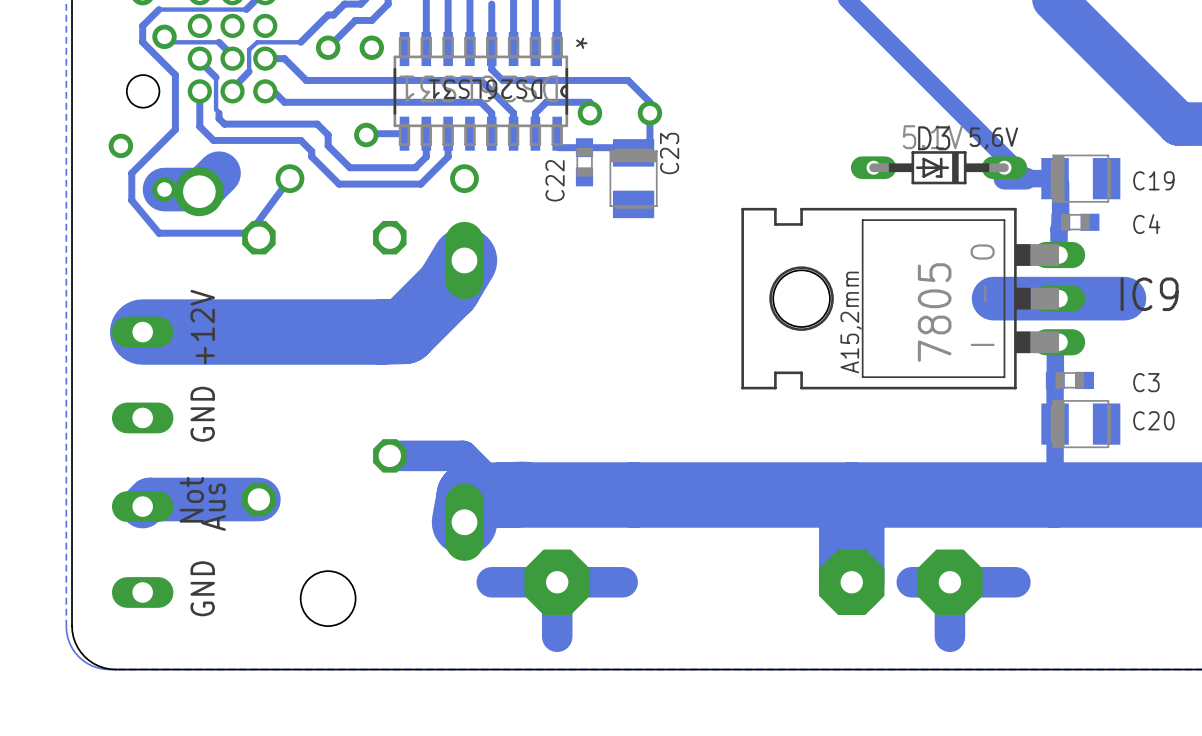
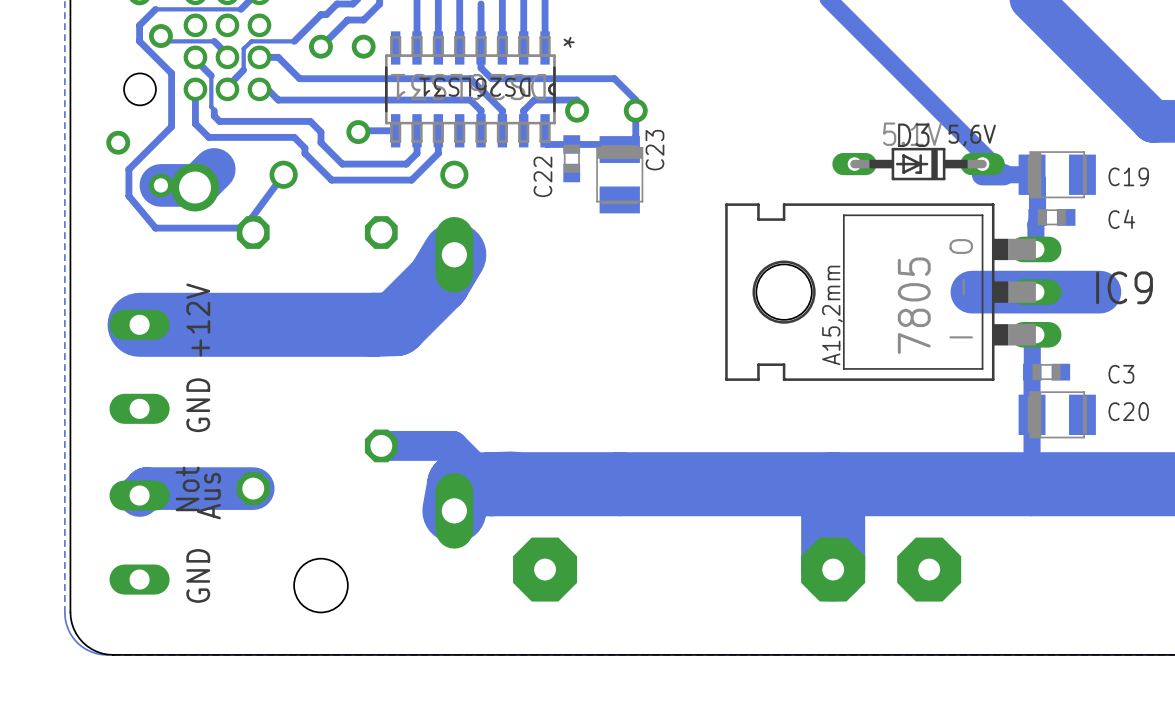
track: (557, 582) (557, 636) -> none
track: (622, 582) (491, 582) -> none
track: (949, 582) (949, 636) -> none
track: (1015, 582) (911, 582) -> none

